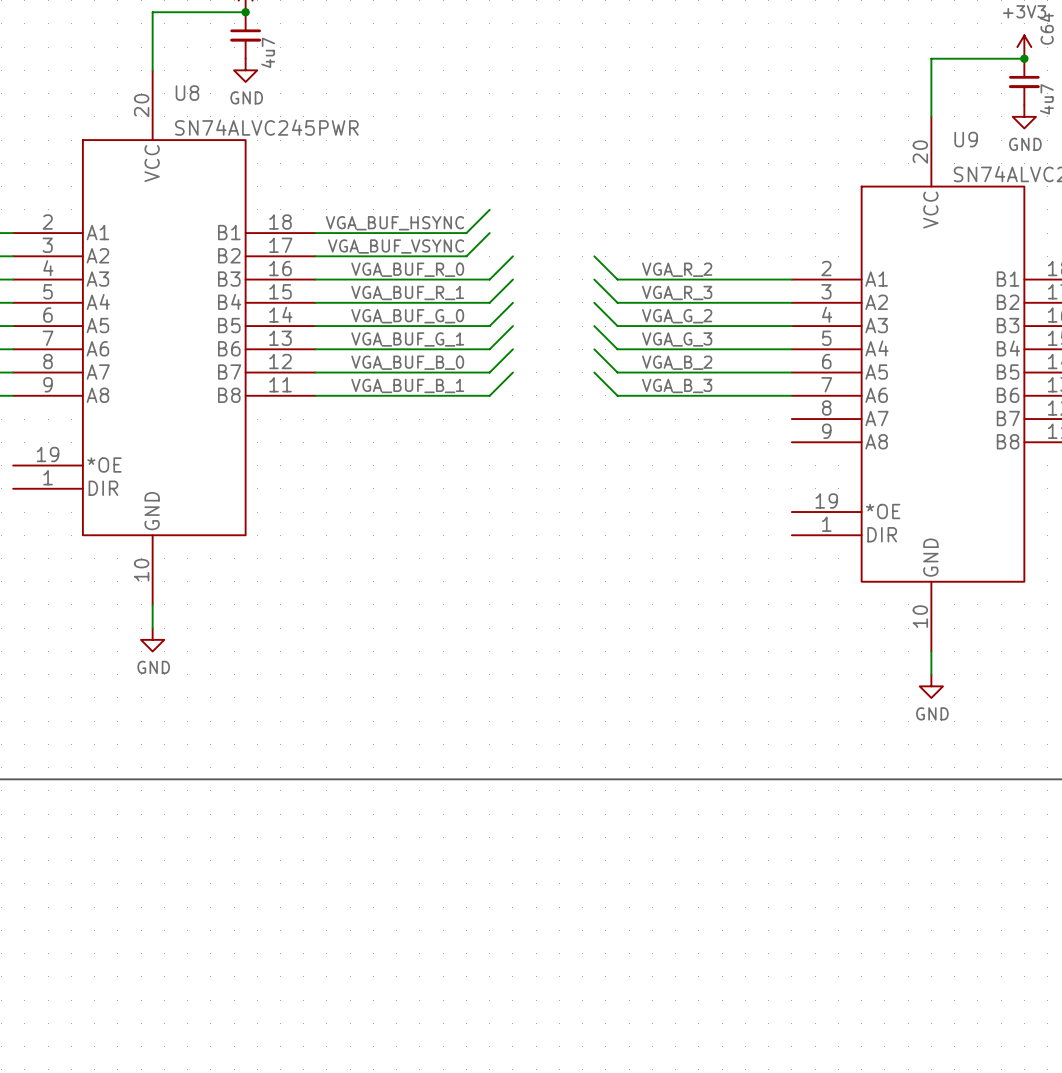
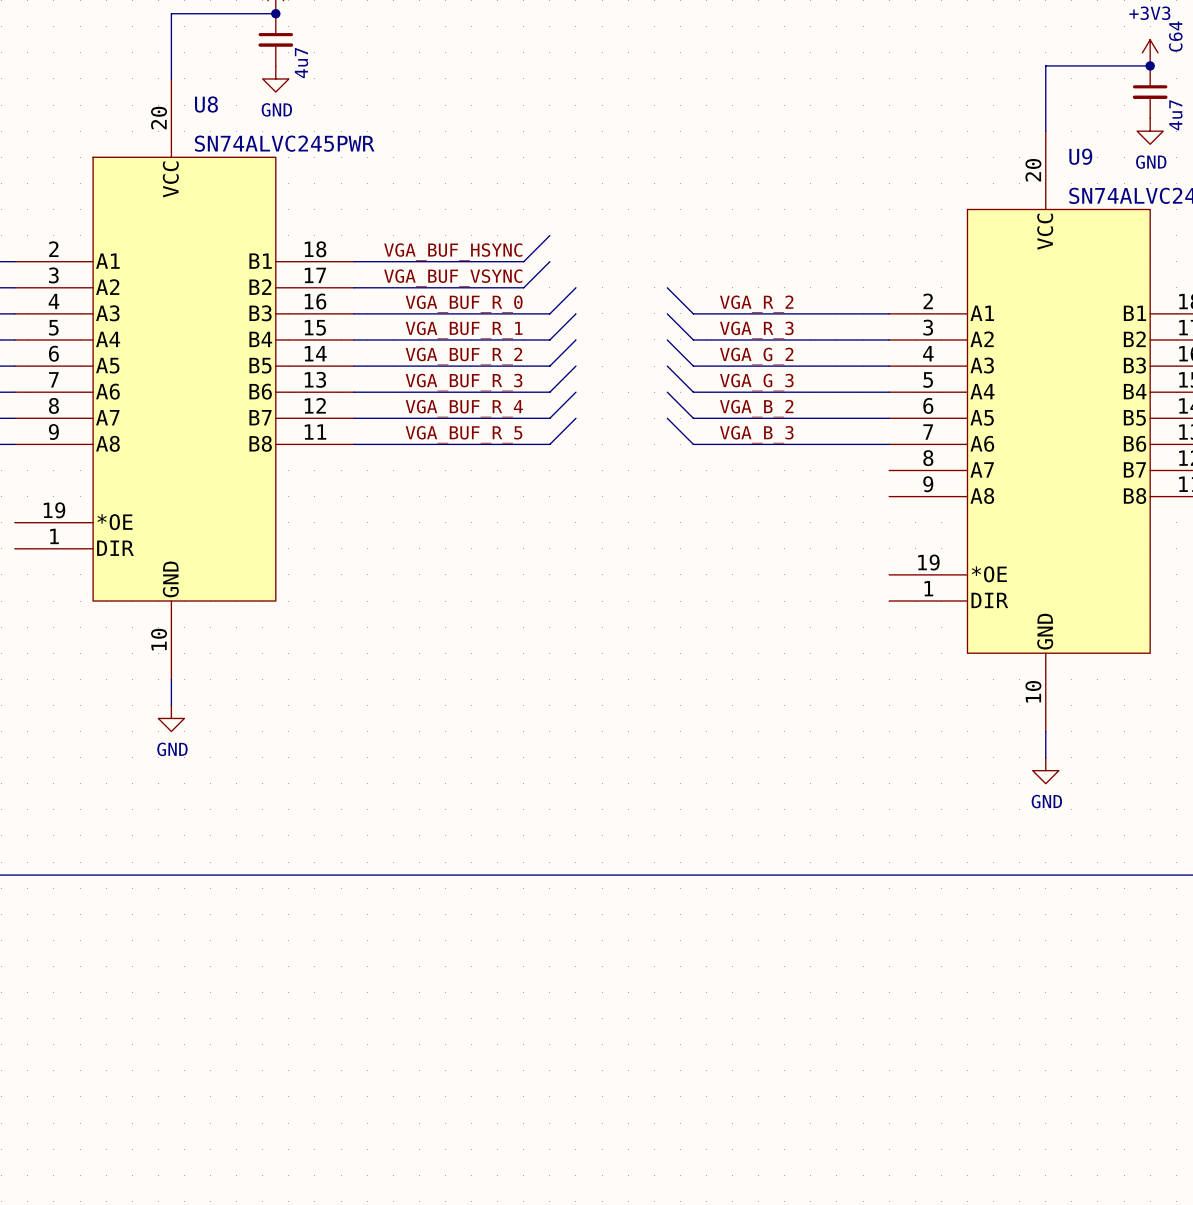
label: VGA_BUF_G_0 (407, 316) -> VGA_BUF_R_2 (463, 356)
label: VGA_BUF_G_1 (407, 339) -> VGA_BUF_R_3 (464, 382)
label: VGA_BUF_B_0 (407, 362) -> VGA_BUF_R_4 (464, 408)
label: VGA_BUF_B_1 (407, 385) -> VGA_BUF_R_5 (464, 434)

